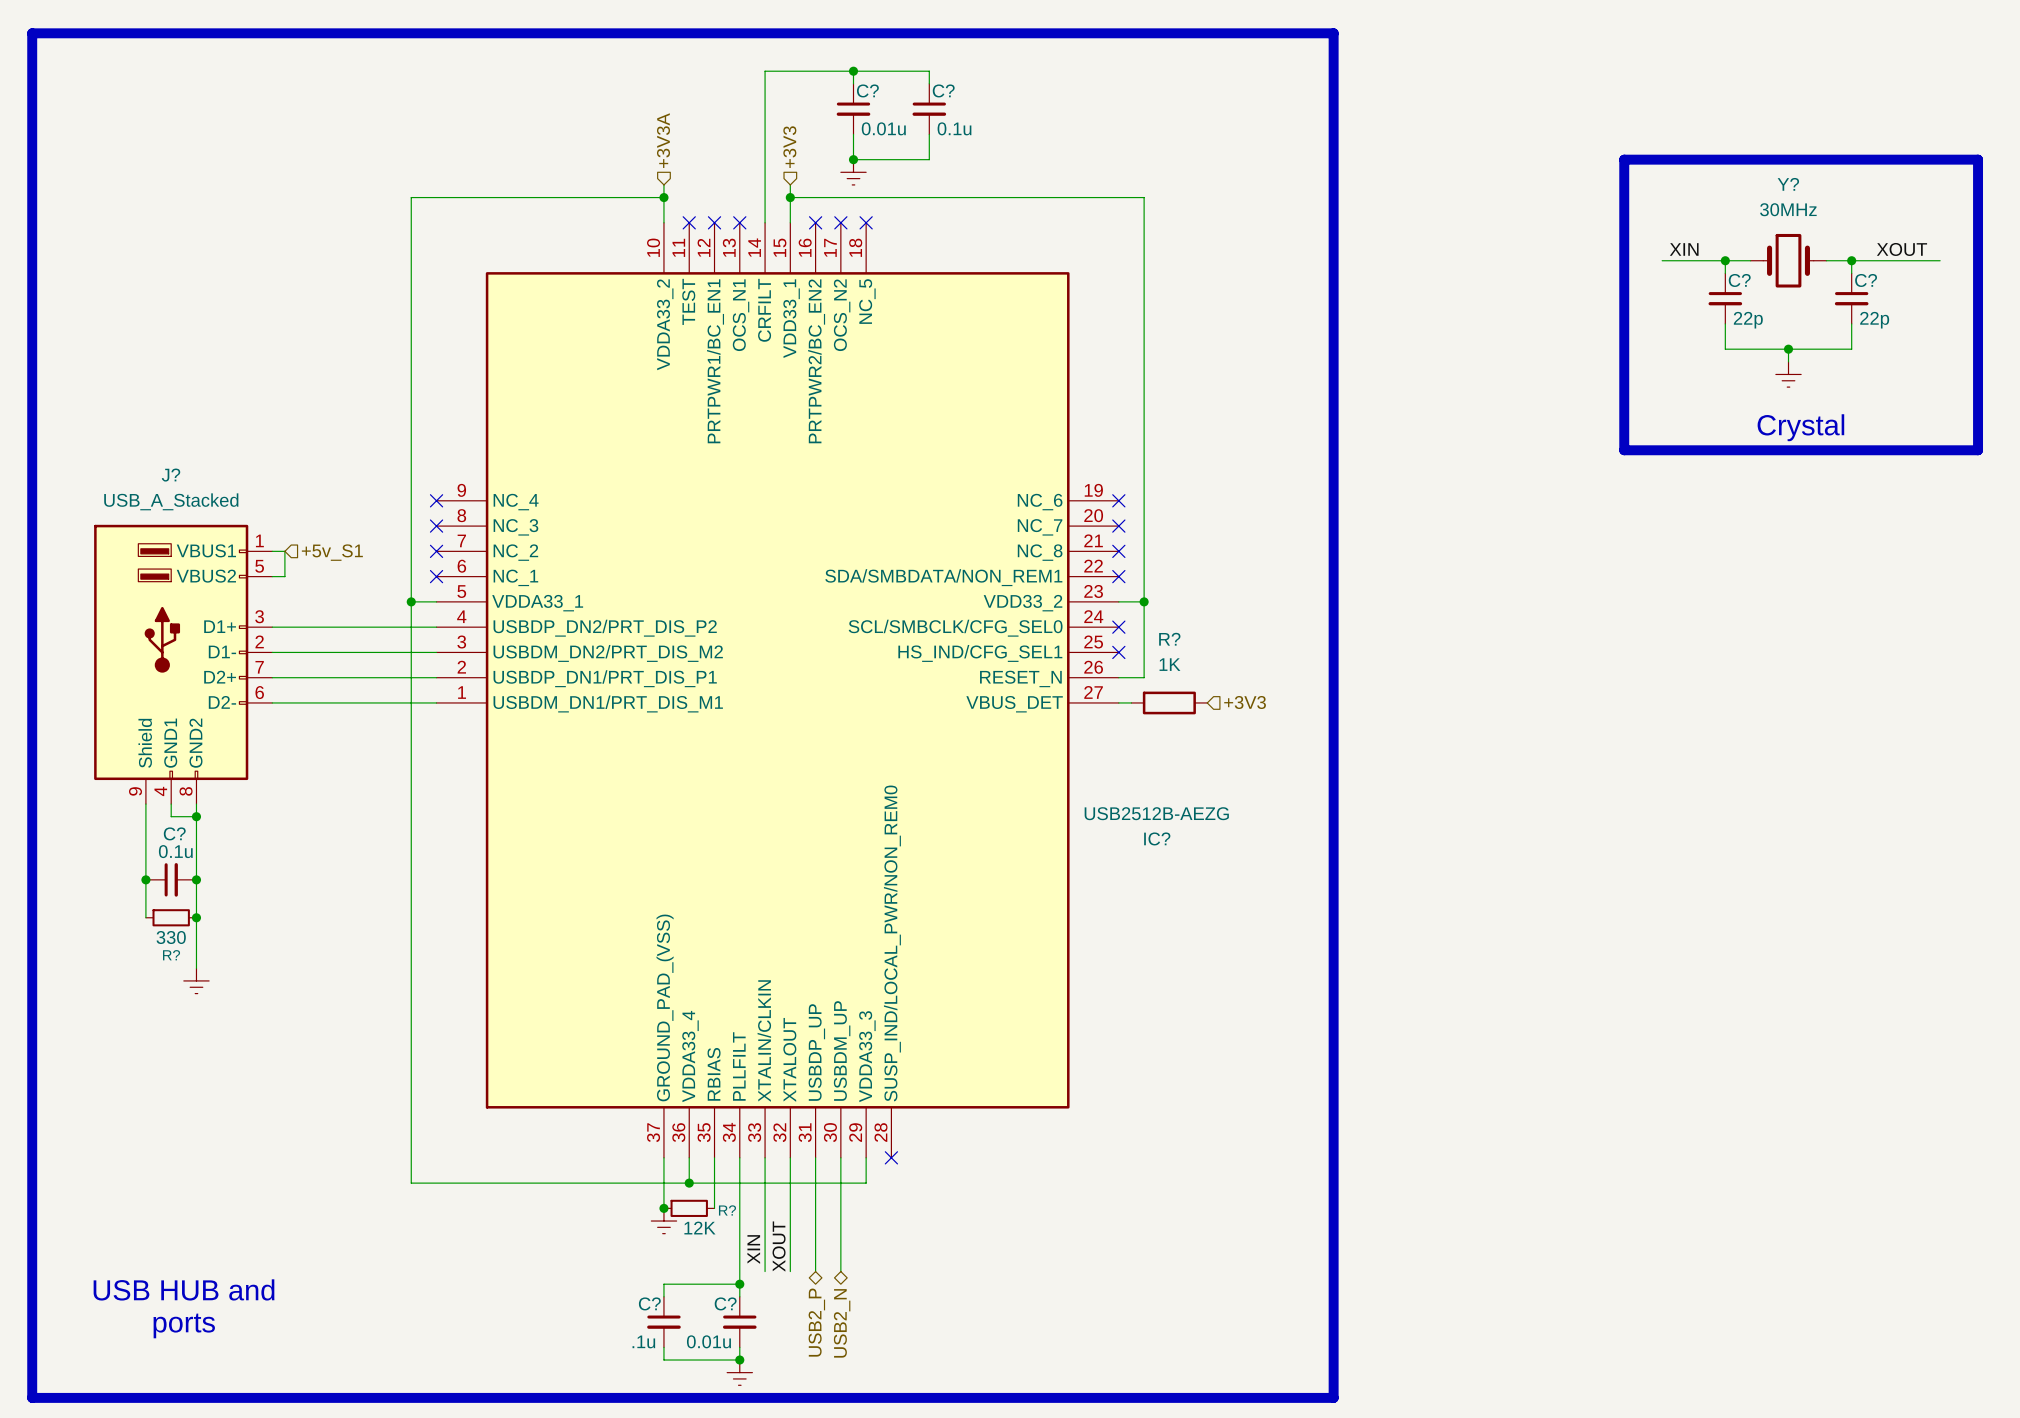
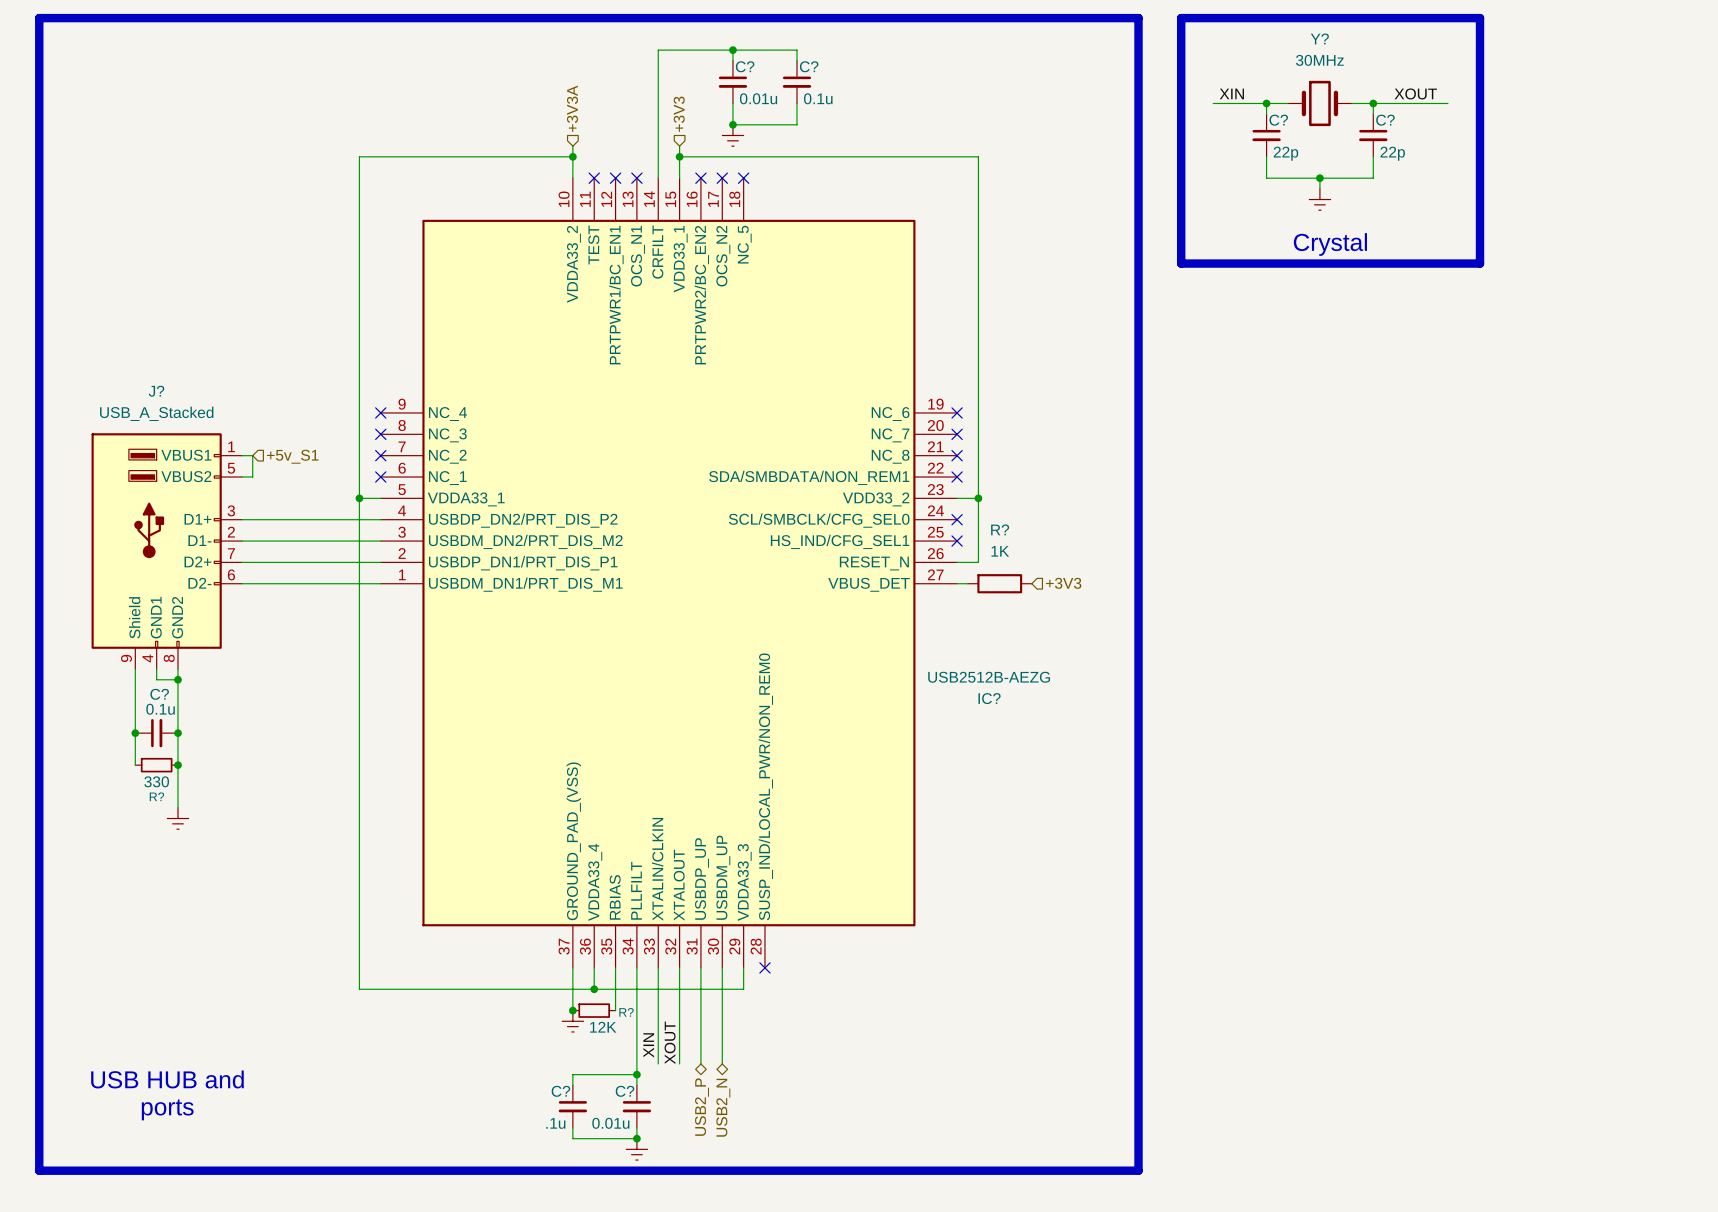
line: none -> (1181, 18) (1480, 18) (1480, 263) (1181, 263) (1181, 18)
label: none -> XIN (1231, 93)
label: none -> XOUT (1415, 93)
wire: none -> (1213, 103) (1287, 103)
wire: none -> (1266, 103) (1266, 114)
junction: none -> (1266, 103)
Y?: none -> 30MHz (1319, 103)
wire: none -> (1351, 103) (1448, 103)
junction: none -> (1373, 103)
line: (1624, 159) (1978, 159) (1978, 450) (1624, 450) (1624, 159) -> none
C?: none -> 22p (1266, 135)
C?: none -> 22p (1373, 135)
wire: none -> (1266, 156) (1266, 178) (1373, 178) (1373, 156)
wire: none -> (1319, 178) (1319, 188)
junction: none -> (1319, 178)
power symbol: none -> (1319, 199)
label: XIN (1684, 249) -> none
label: XOUT (1901, 249) -> none
wire: (1662, 260) (1750, 260) -> none
wire: (1725, 260) (1725, 273) -> (1373, 103) (1373, 114)
junction: (1725, 260) -> none
Y?: 30MHz (1788, 260) -> none
wire: (1826, 260) (1940, 260) -> none
wire: (1851, 260) (1851, 273) -> none
junction: (1851, 260) -> none
C?: 22p (1725, 298) -> none
C?: 22p (1851, 298) -> none
text: none -> Crystal (1330, 244)
wire: (1725, 323) (1725, 349) (1851, 349) (1851, 323) -> none
wire: (1788, 349) (1788, 361) -> none
junction: (1788, 349) -> none
power symbol: (1788, 374) -> none
text: Crystal (1800, 427) -> none

